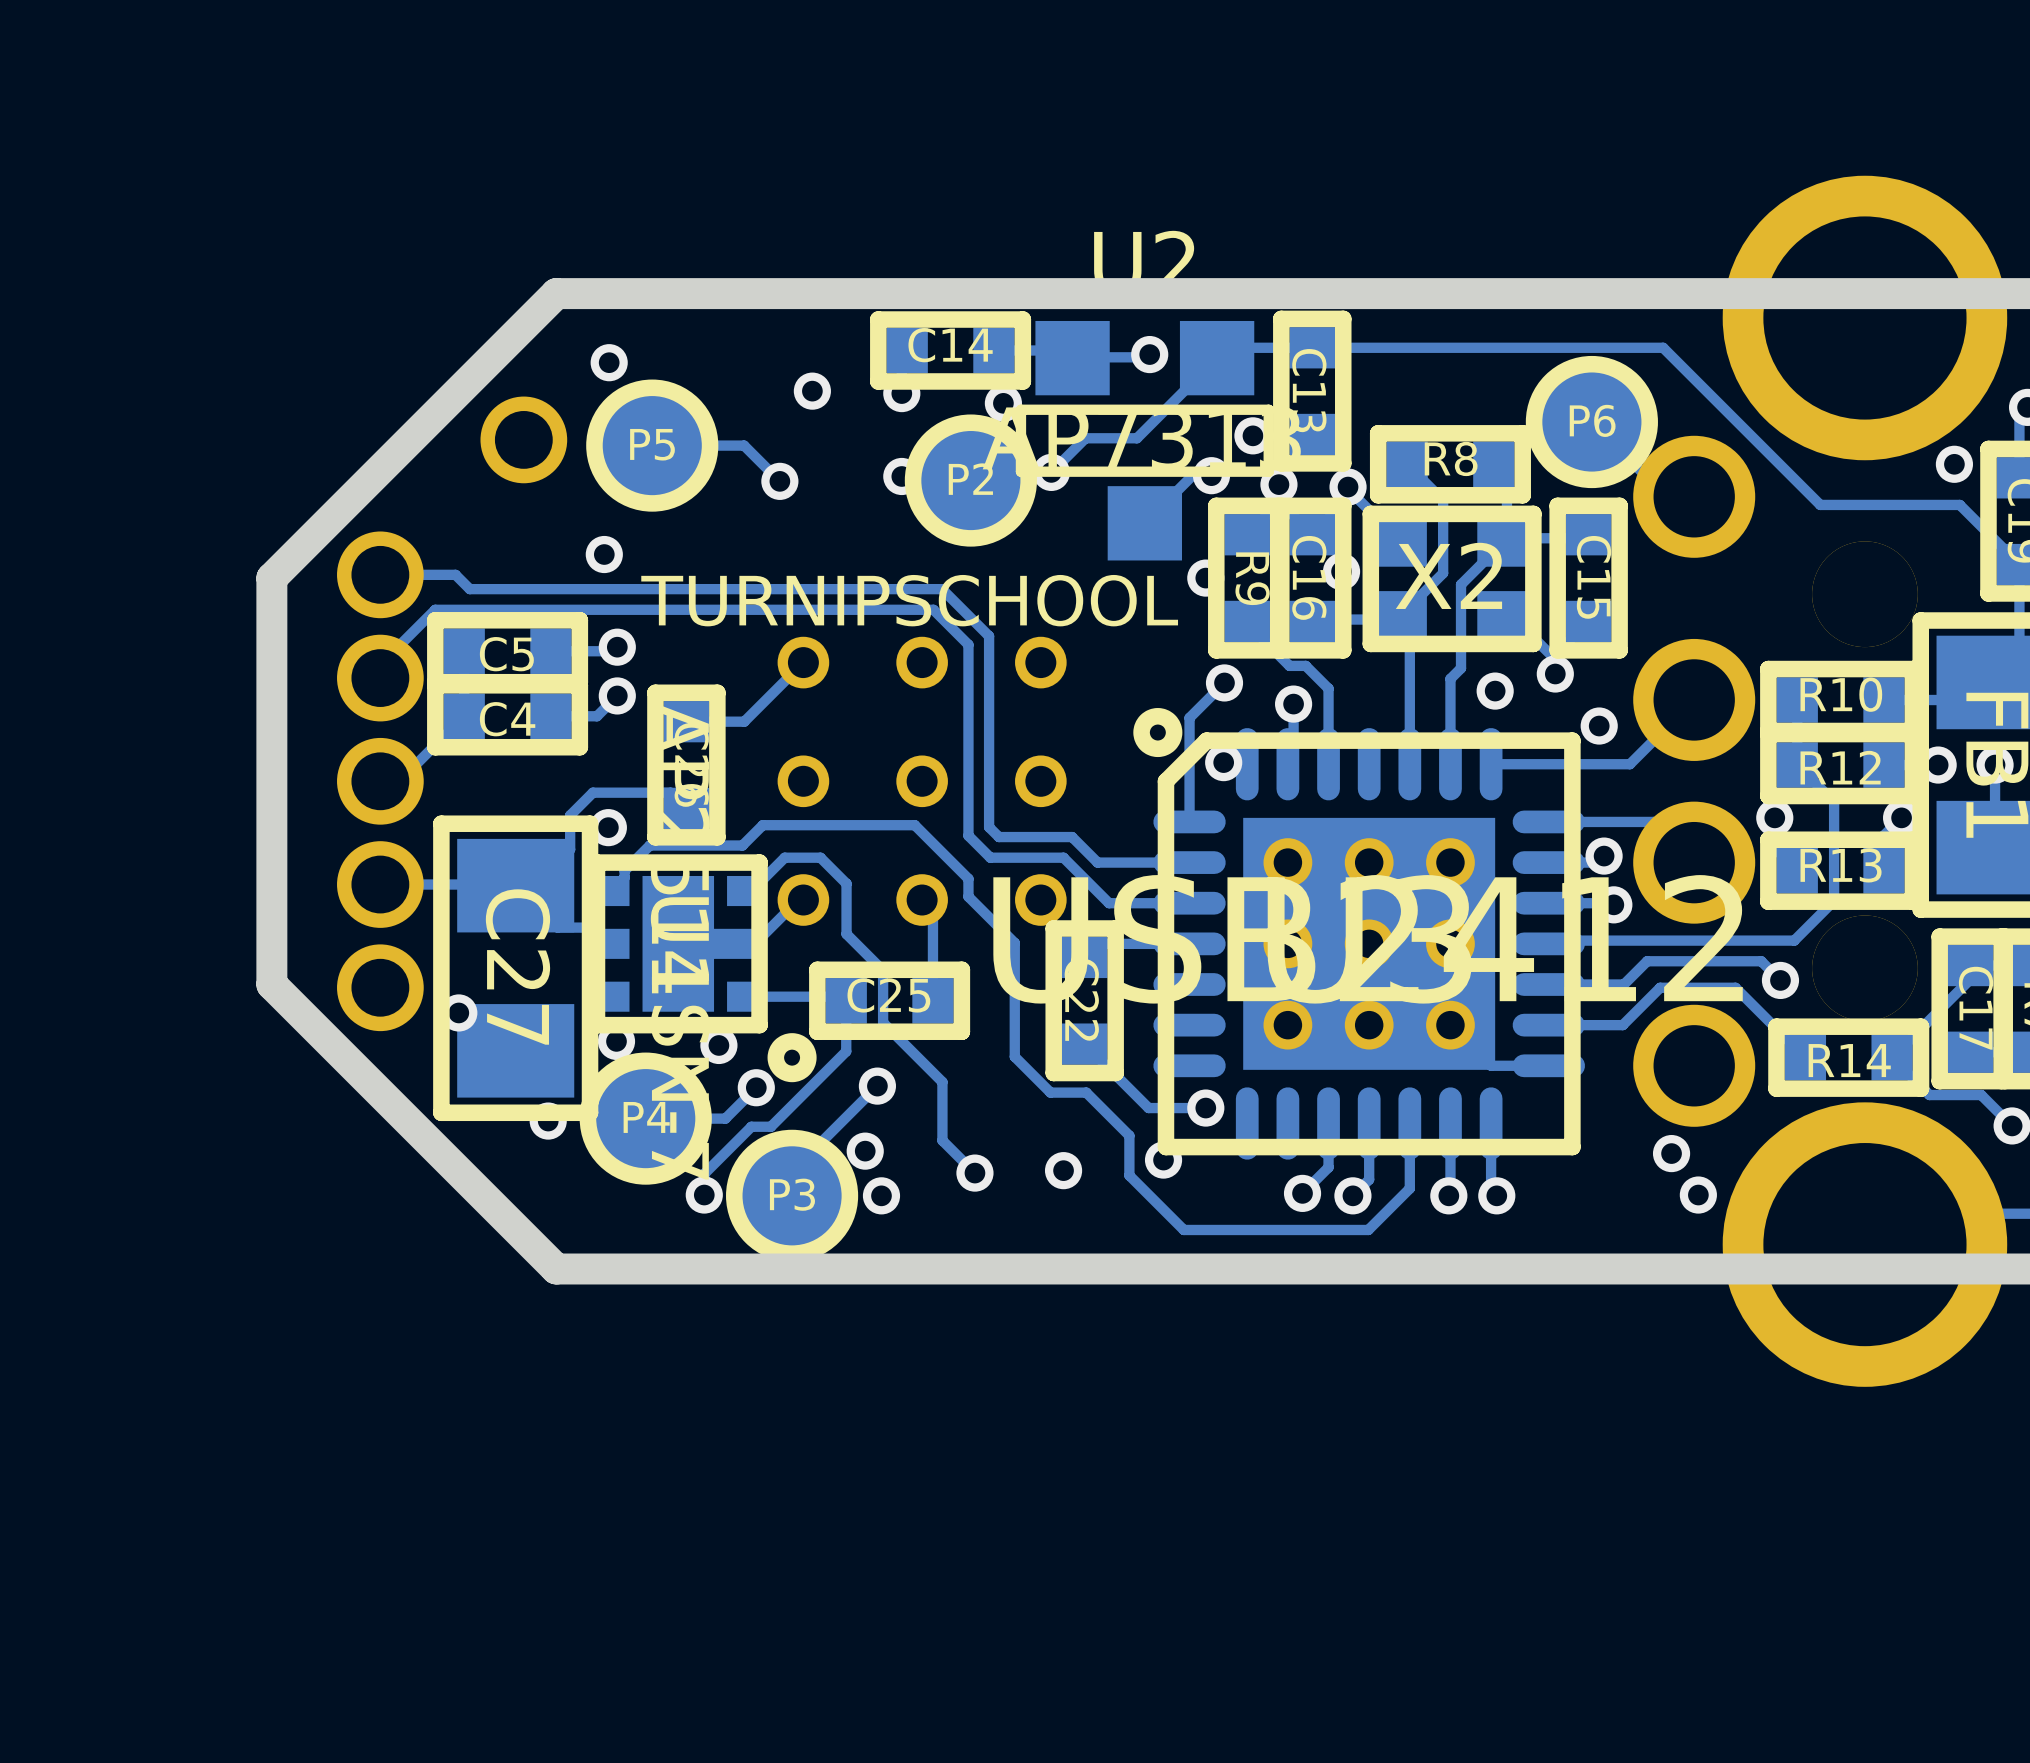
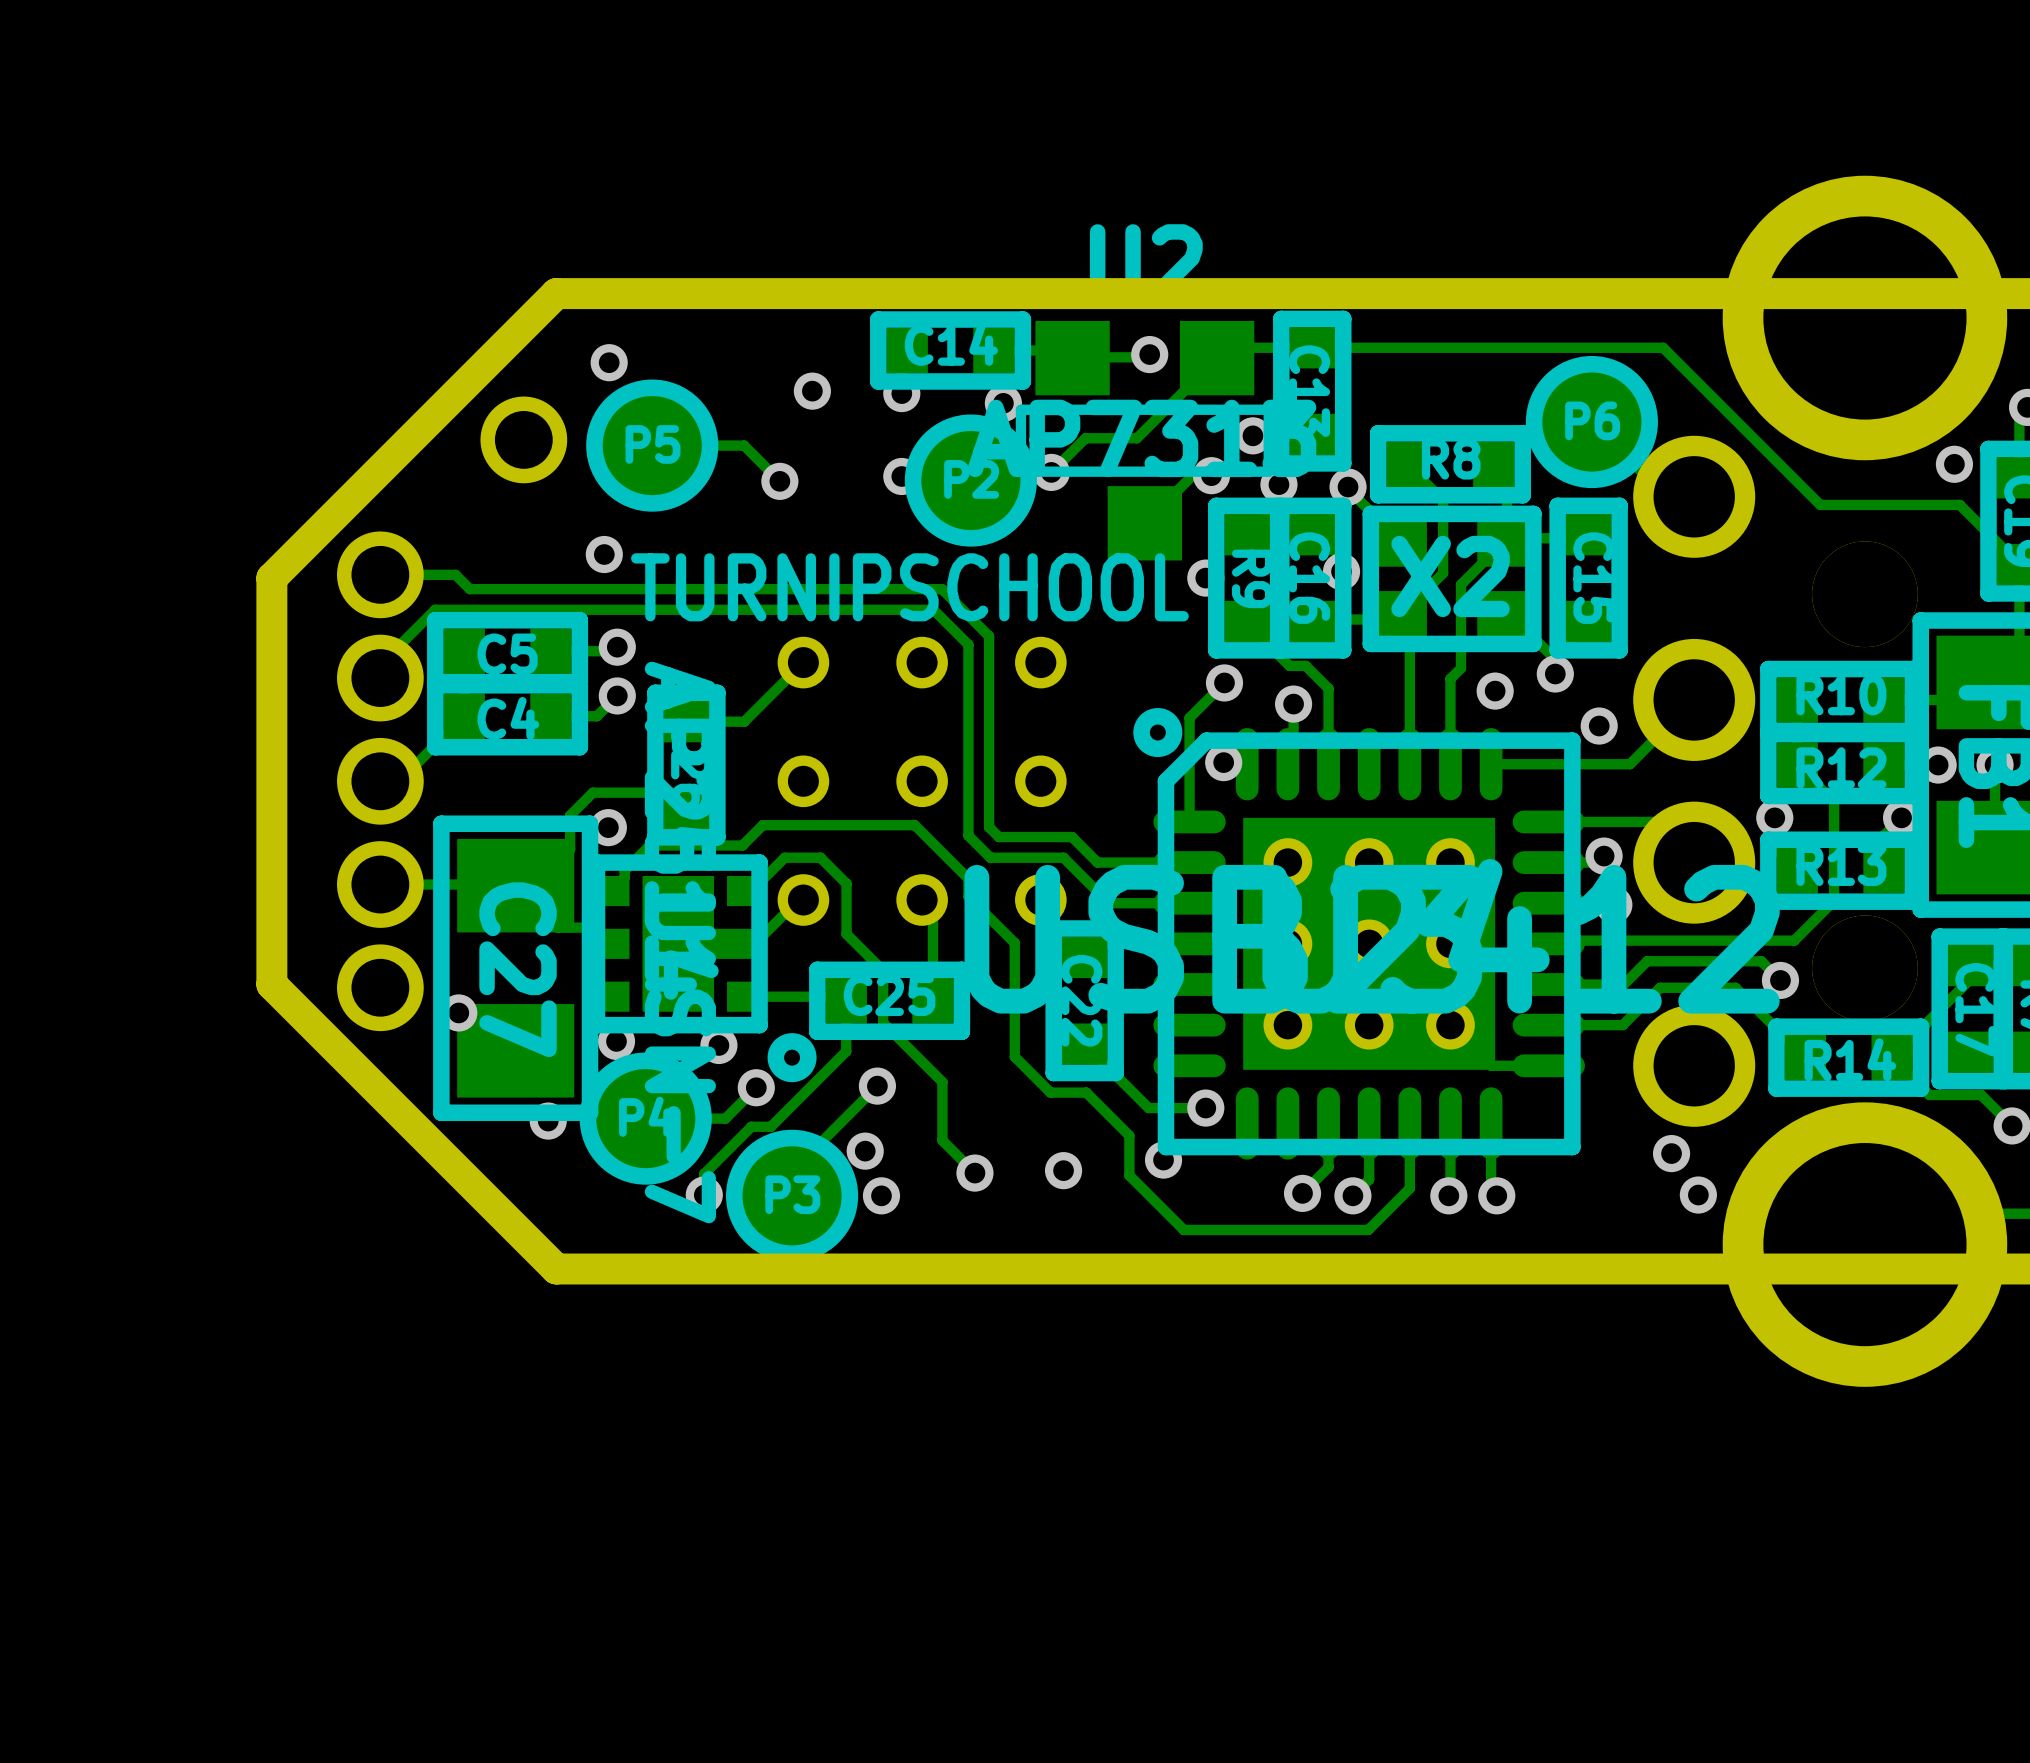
text position: TURNIPSCHOOL (909, 600) -> TURNIPSCHOOL (909, 587)

